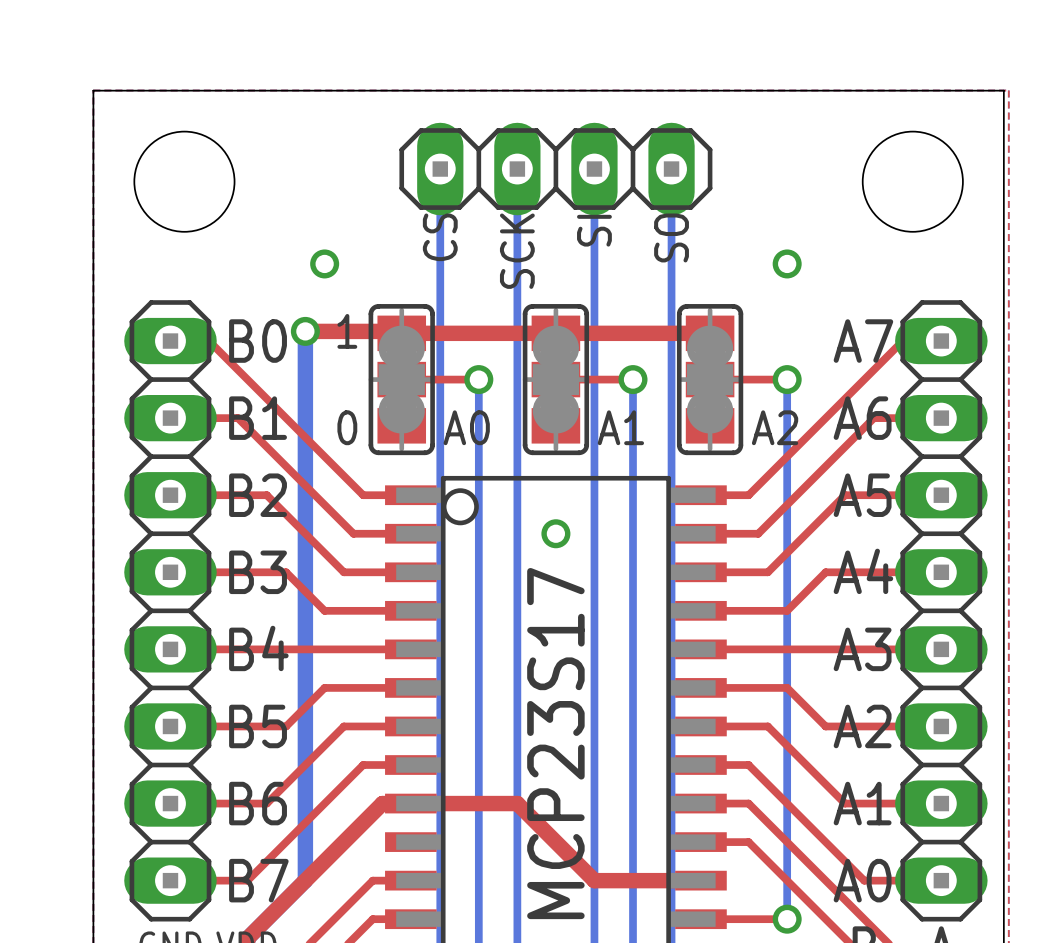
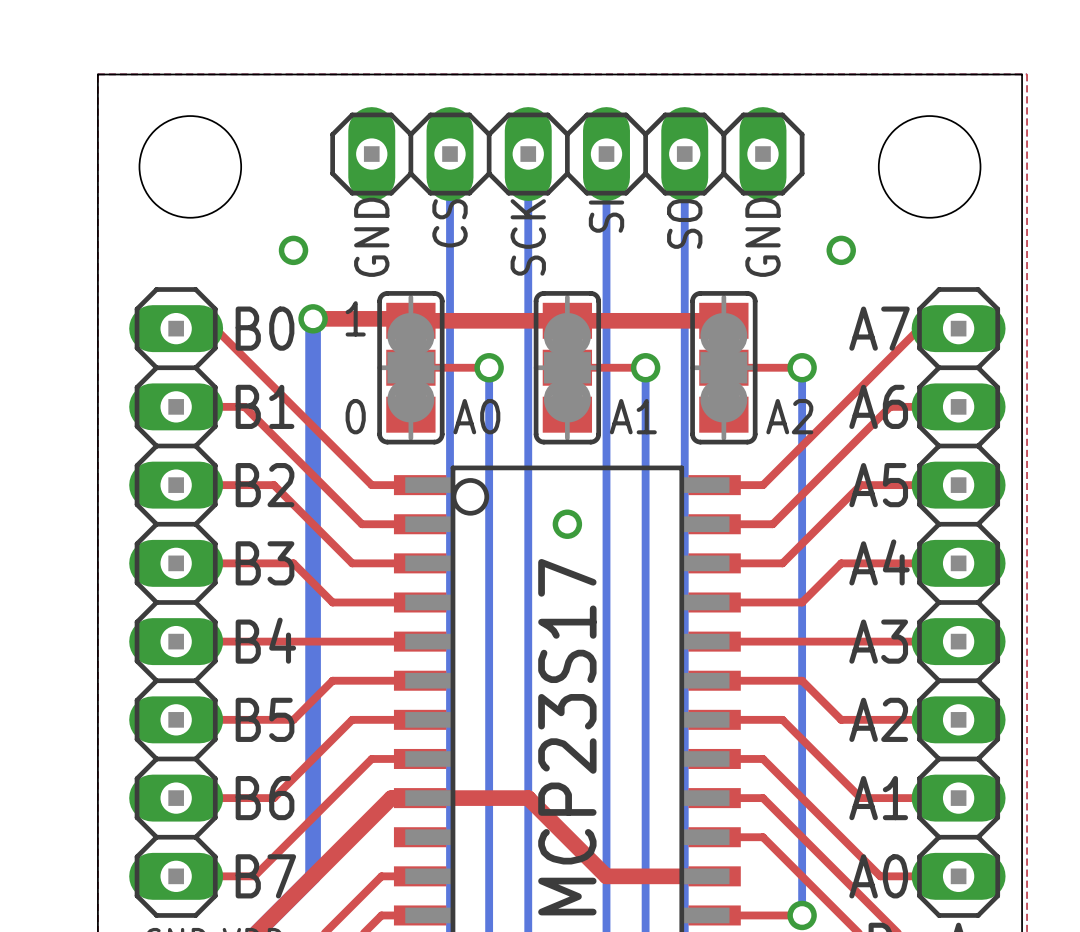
part footprint: [399, 122, 713, 216] -> [330, 107, 805, 201]
text: none -> GND (371, 237)
text: none -> GND (762, 237)
via position: (324, 263) -> (293, 250)
via position: (787, 263) -> (841, 250)

